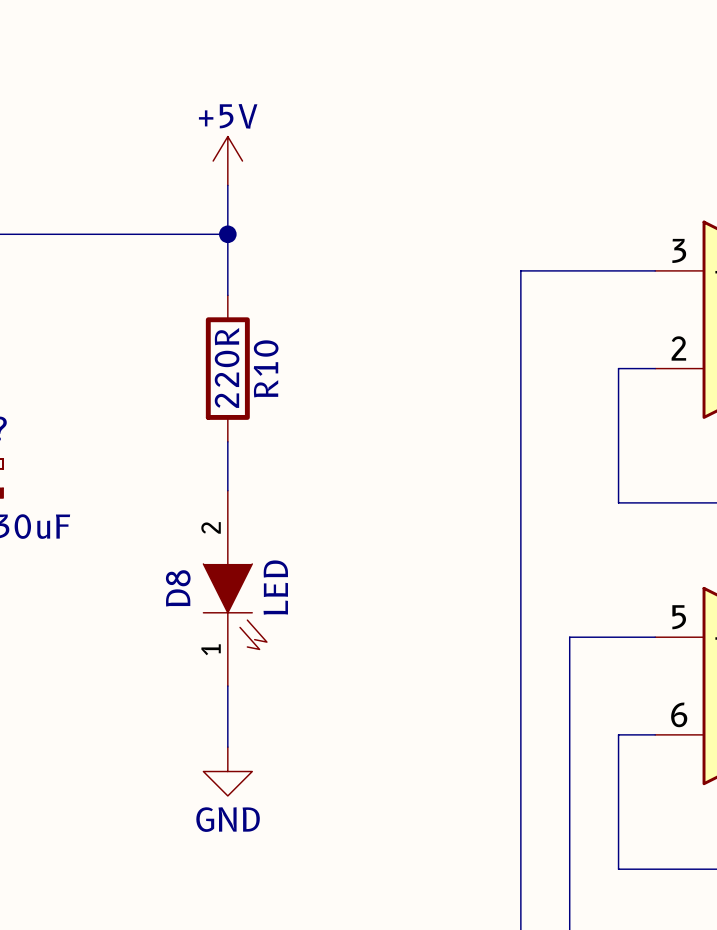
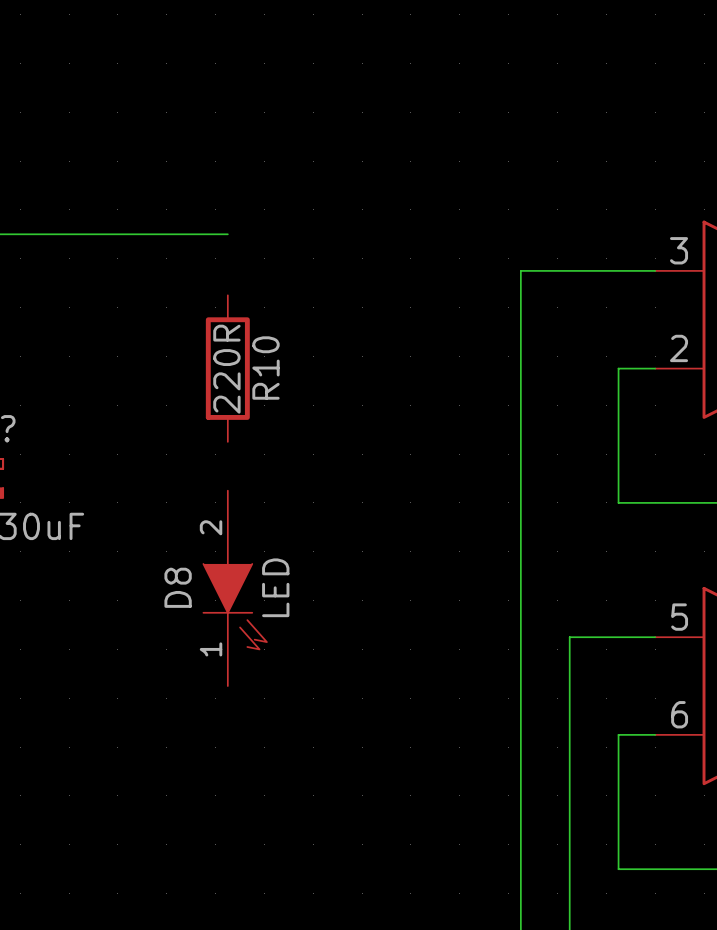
power symbol: +5V (227, 161) -> none
wire: (227, 185) (227, 295) -> none
junction: (227, 234) -> none
wire: (227, 441) (227, 490) -> none
wire: (227, 686) (227, 747) -> none
power symbol: GND (227, 771) -> none

